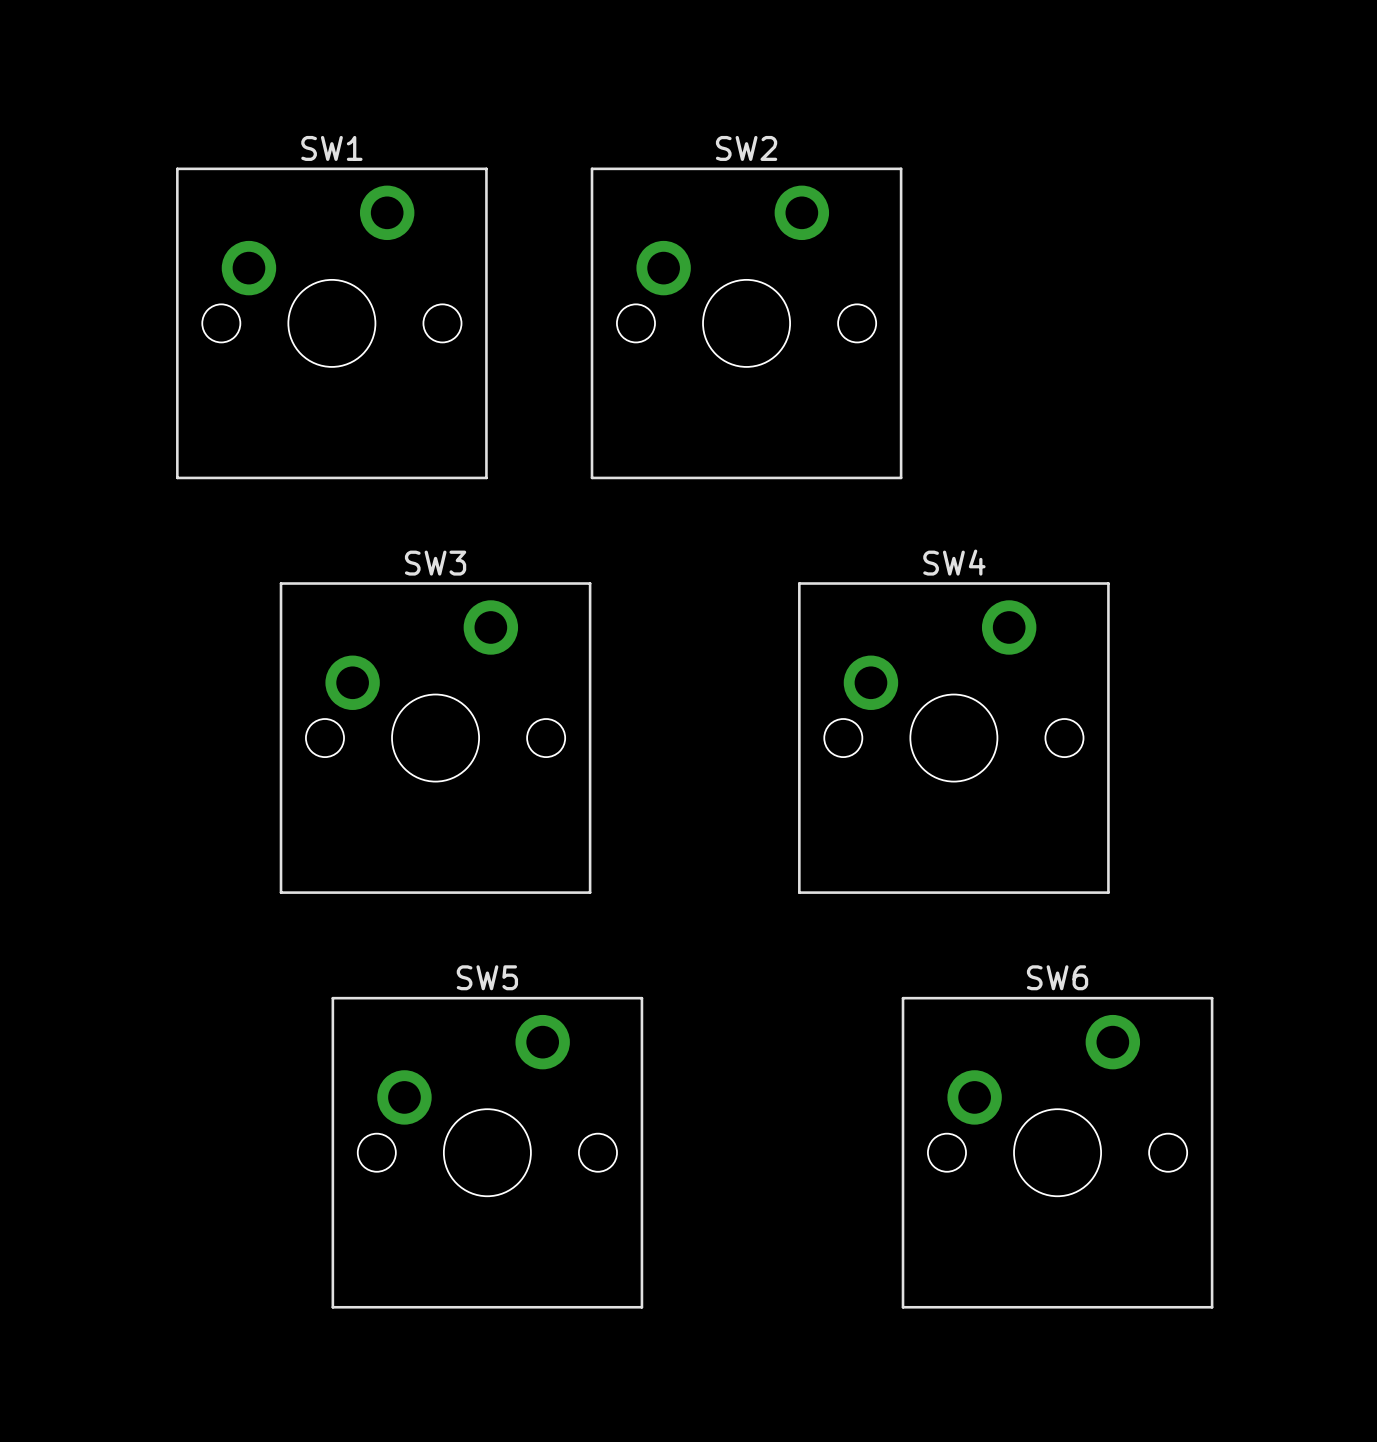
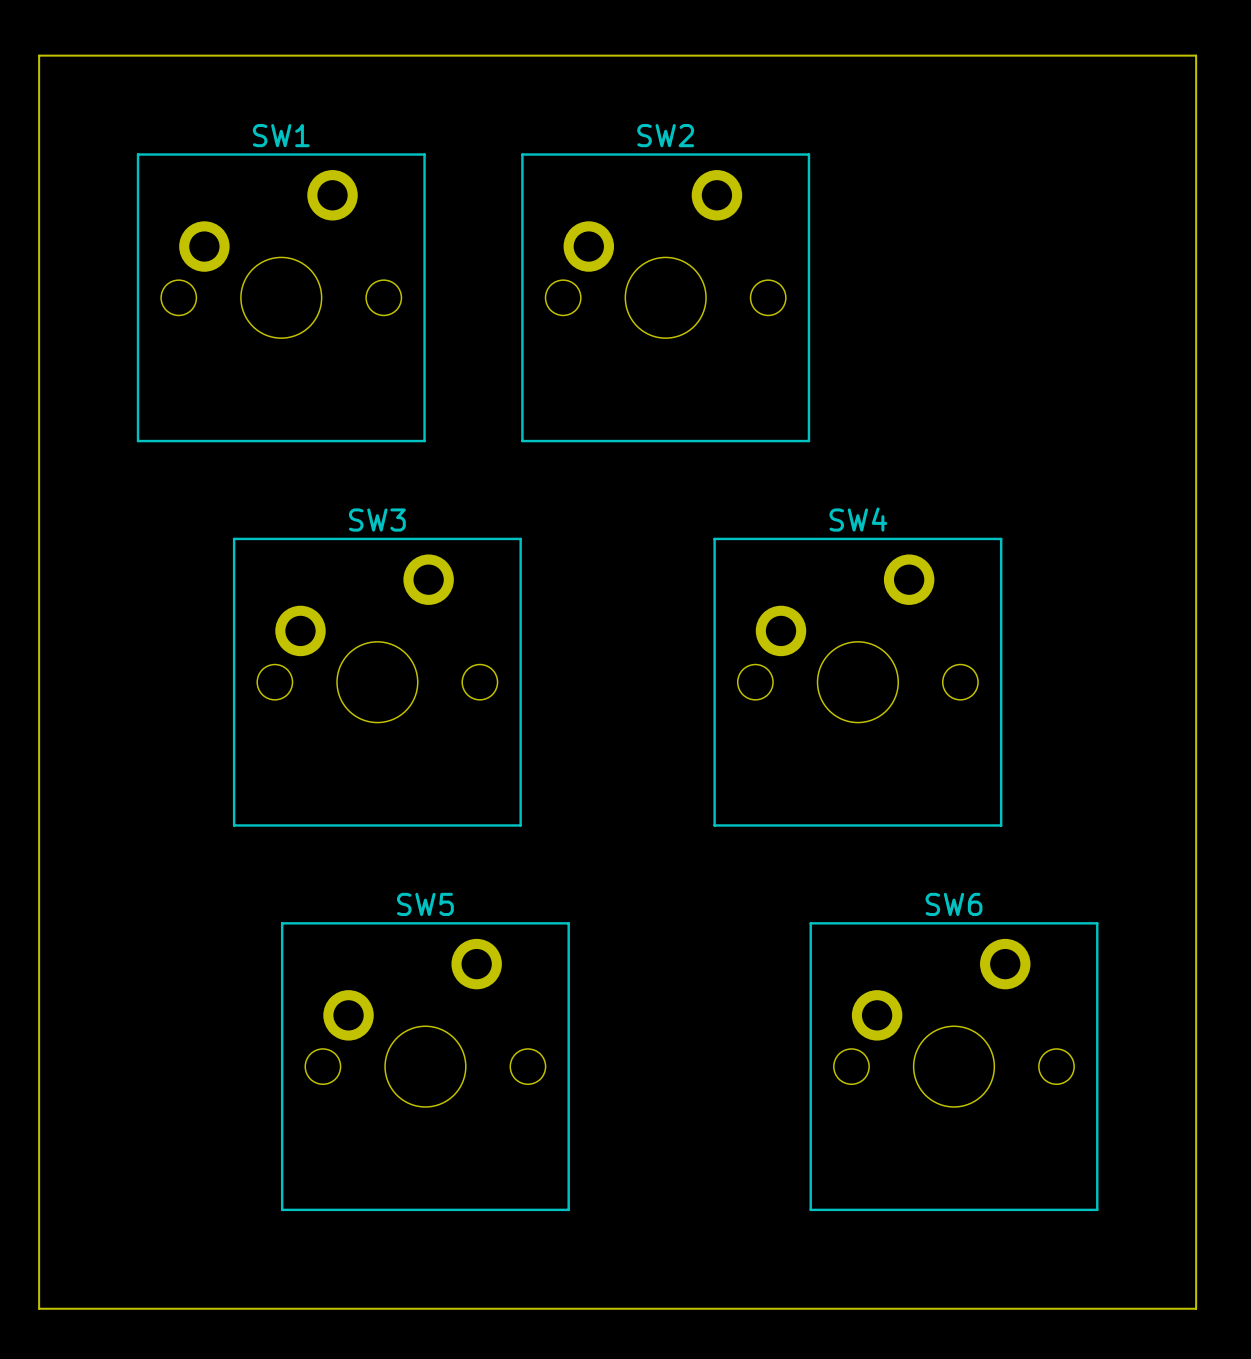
board edge: none -> (39, 55) (39, 1308) (1196, 1308) (1196, 55) (39, 55)

